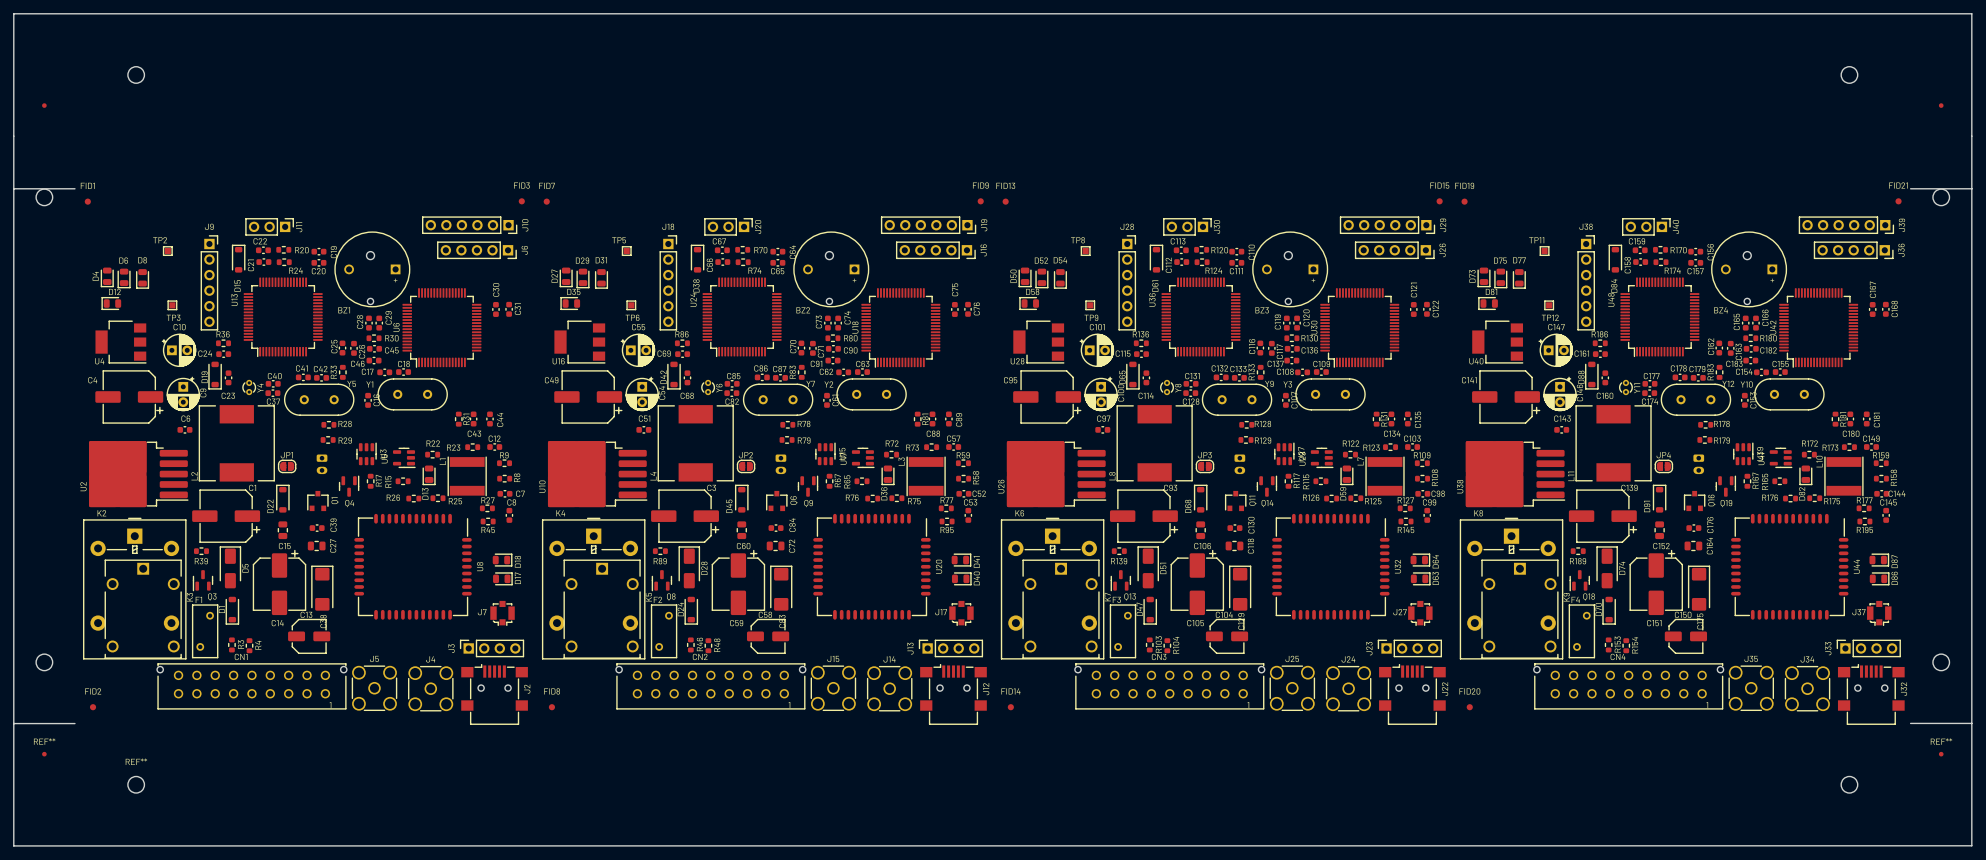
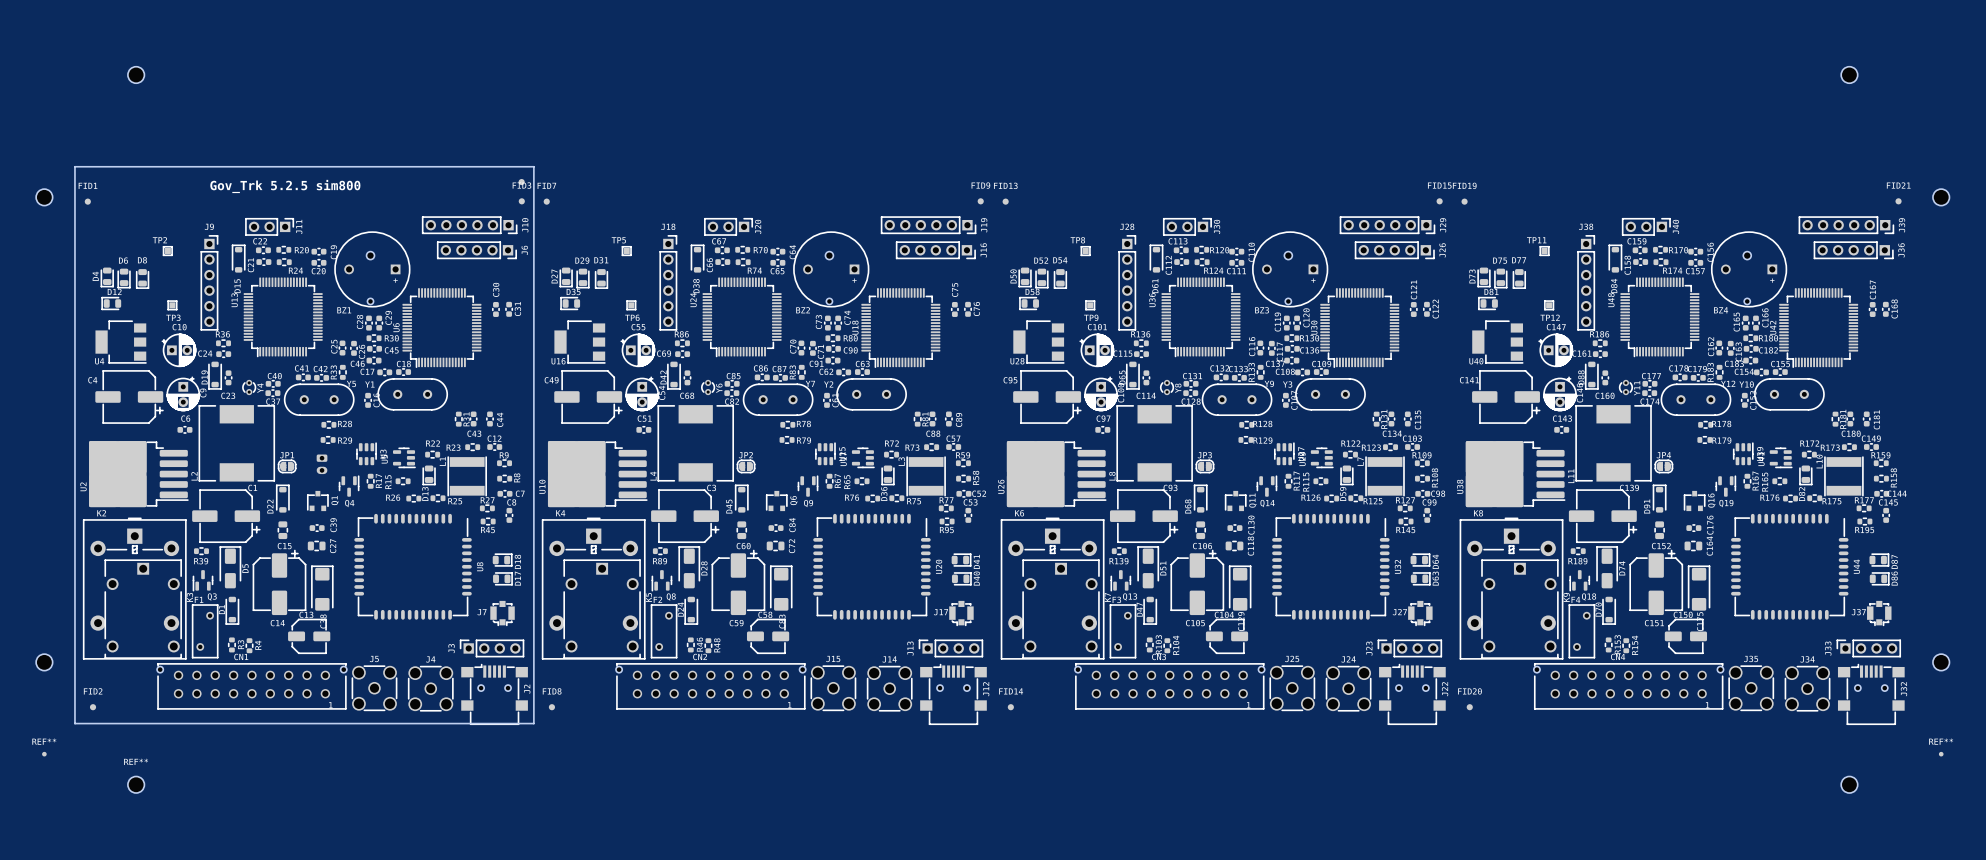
board edge: (13, 13) (13, 845) (1971, 845) (1971, 13) (13, 13) -> none
part: (44, 105) -> none
part: (1941, 105) -> none
board edge: none -> (74, 166) (533, 166) (533, 723) (74, 723) (74, 166)
part: none -> (521, 182)
text: none -> Gov_Trk 5.2.5 sim800 (285, 186)
board edge: (13, 188) (74, 188) -> none
board edge: (1910, 188) (1971, 188) -> none
part: (780, 464) -> none
part: (1239, 464) -> none
part: (1698, 464) -> none
board edge: (13, 723) (74, 723) -> none
board edge: (1910, 723) (1971, 723) -> none

